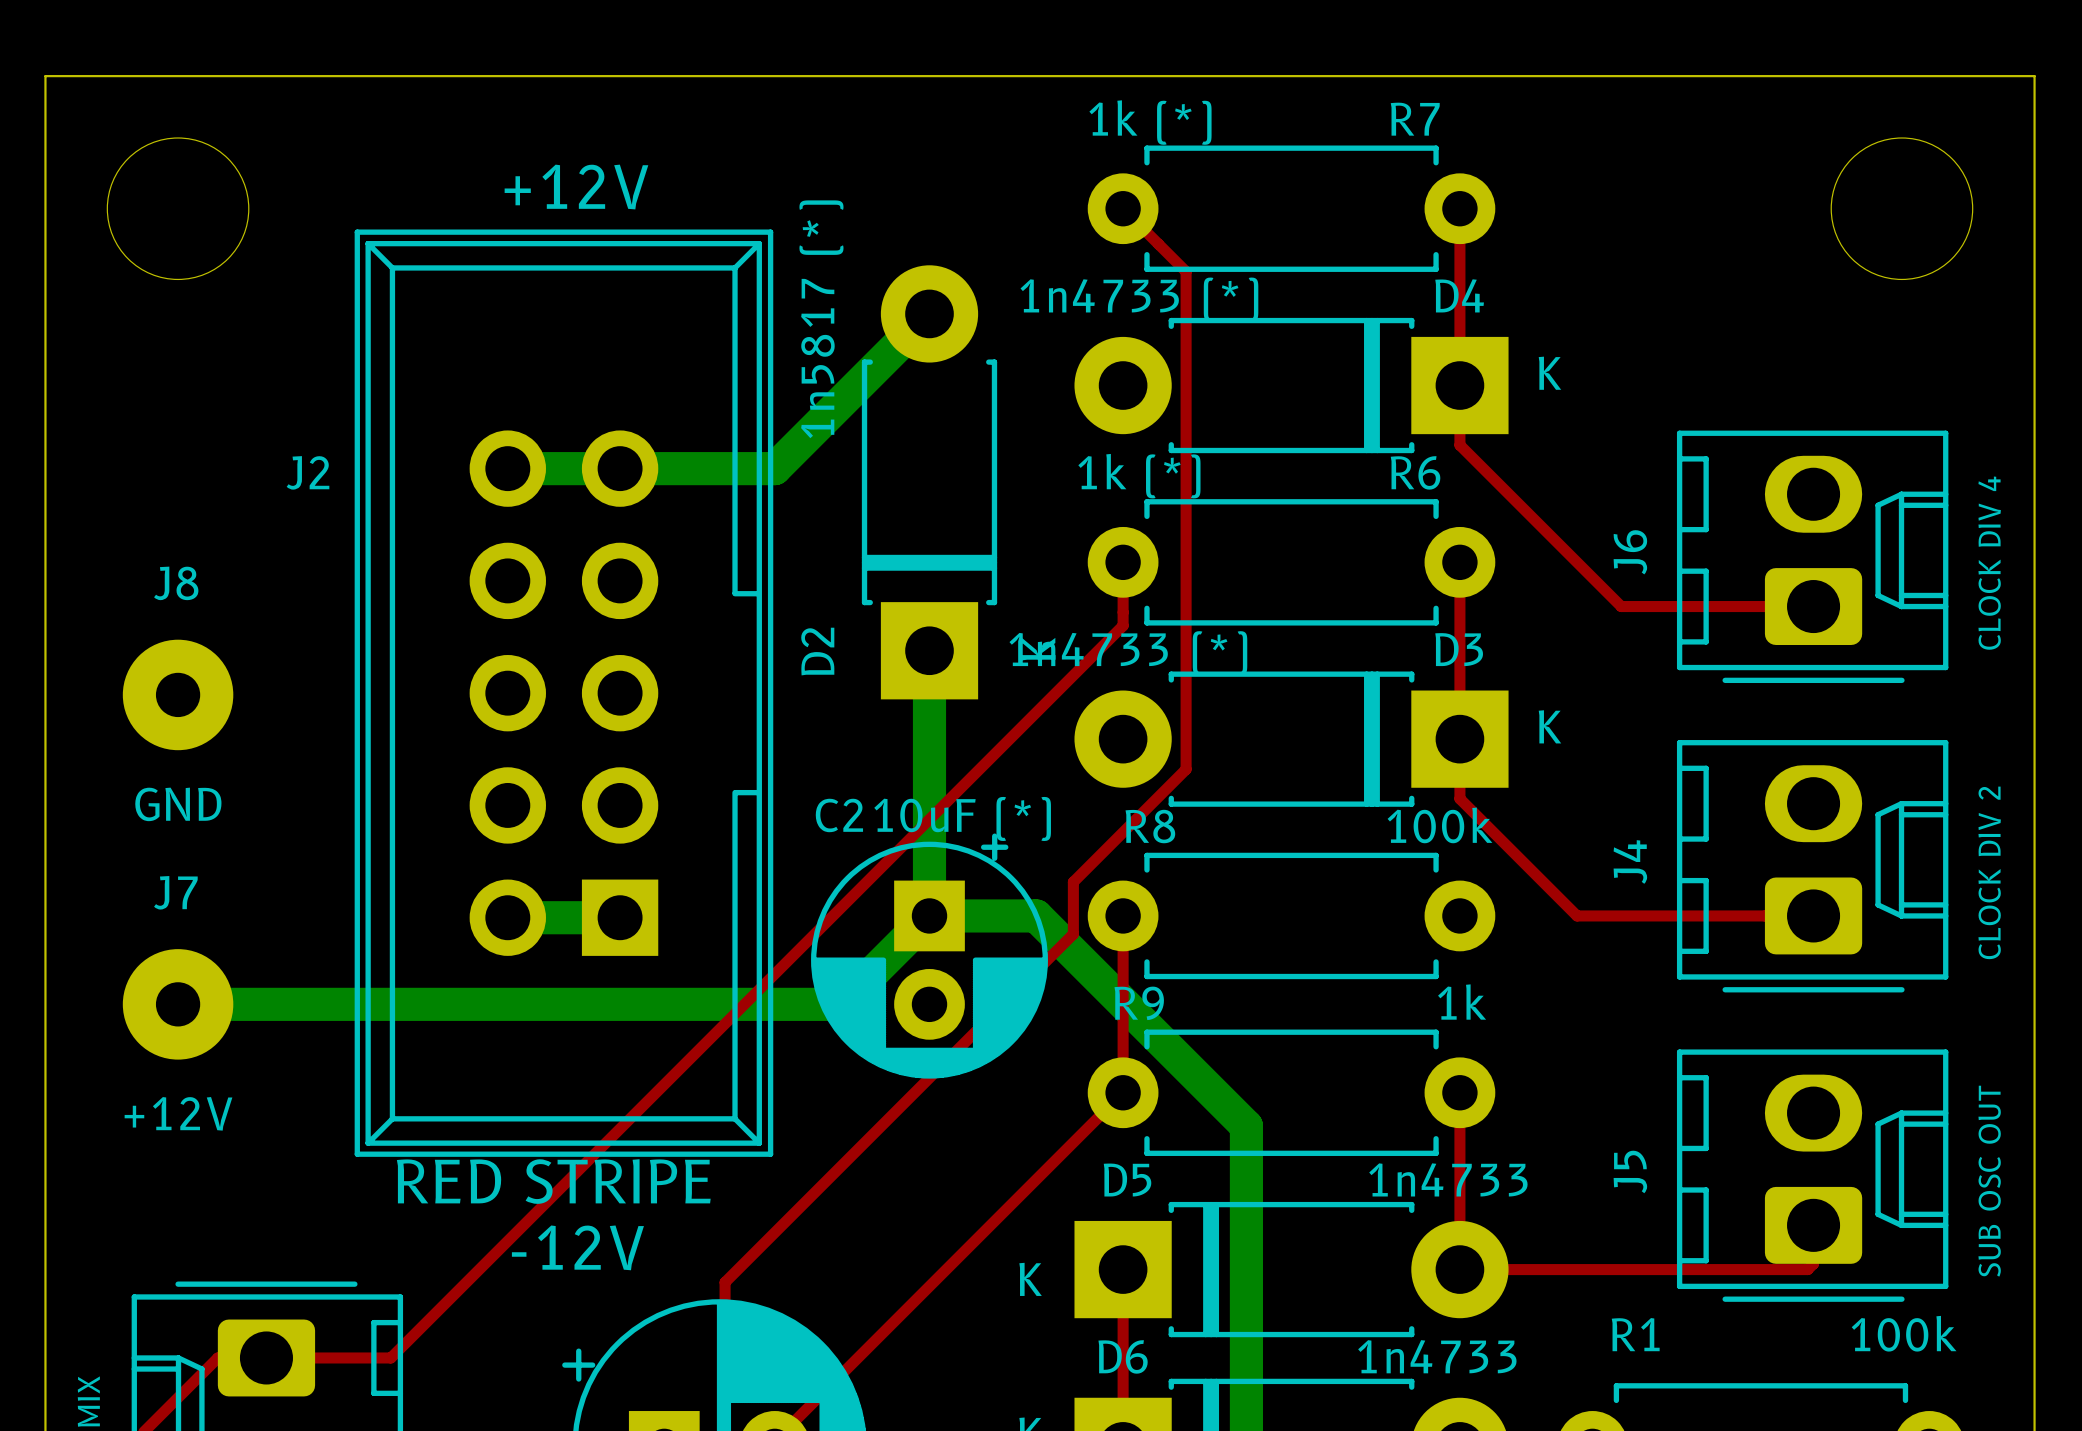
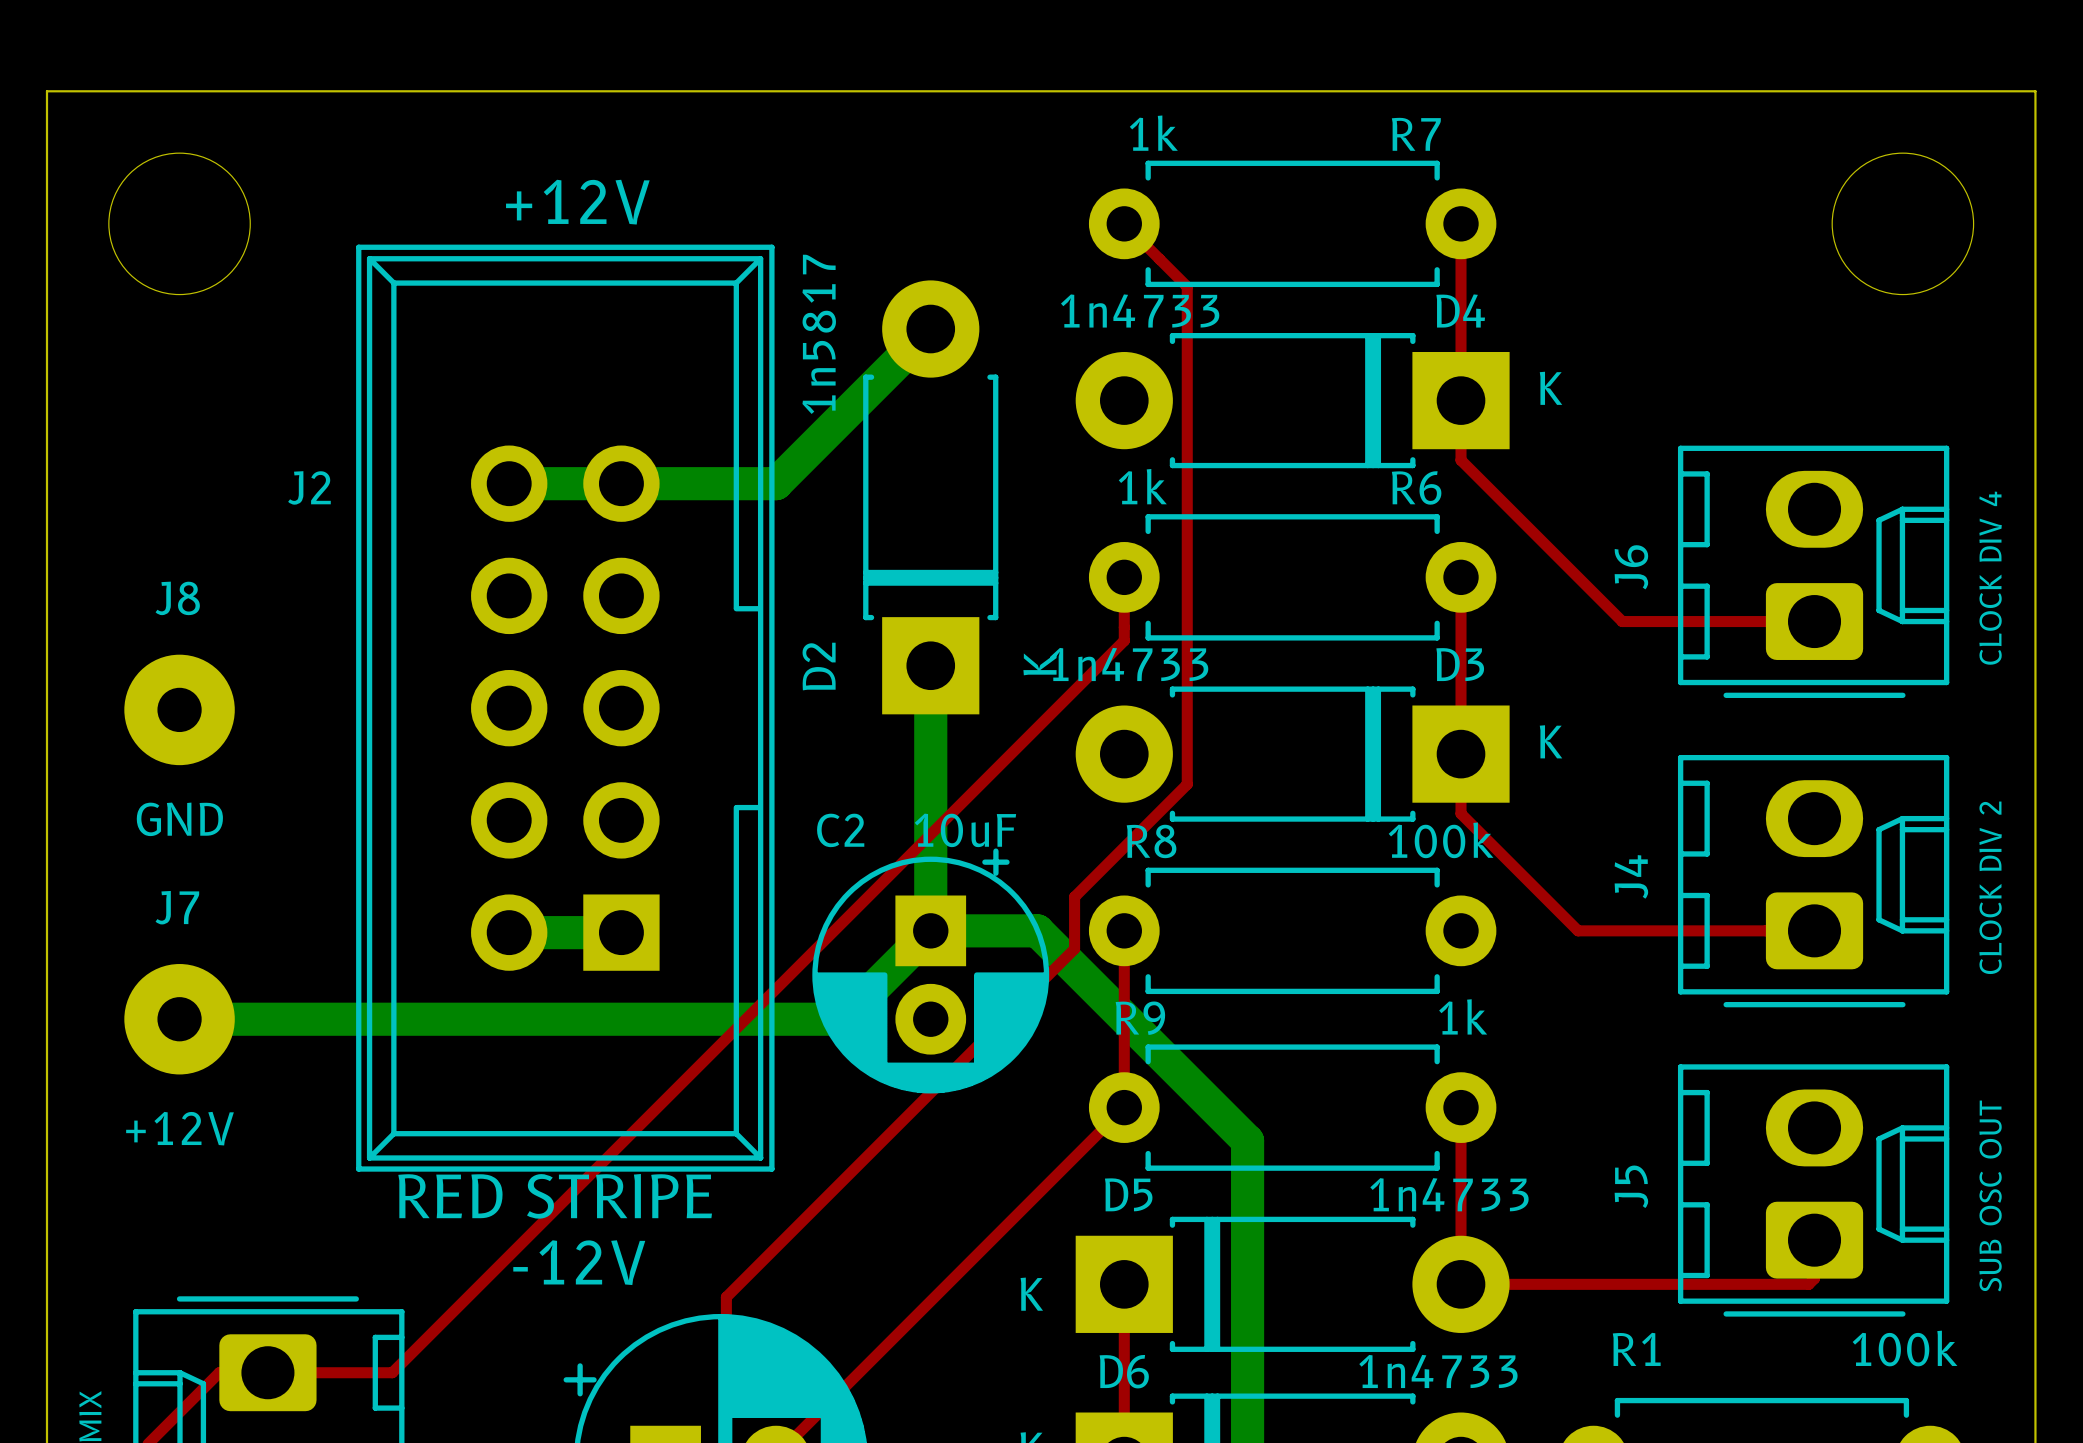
R7 value: 1k (*) (1150, 122) -> 1k (1153, 133)
D4 value: 1n4733 (*) (1139, 299) -> 1n4733 (1140, 310)
D2 value: 1n5817 (*) (821, 319) -> 1n5817 (819, 334)
R6 value: 1k (*) (1139, 476) -> 1k (1142, 486)
D3 value: 1n4733 (*) (1128, 653) -> 1n4733 (1129, 664)
C2 value: 10uF (*) (962, 818) -> 10uF (965, 830)

